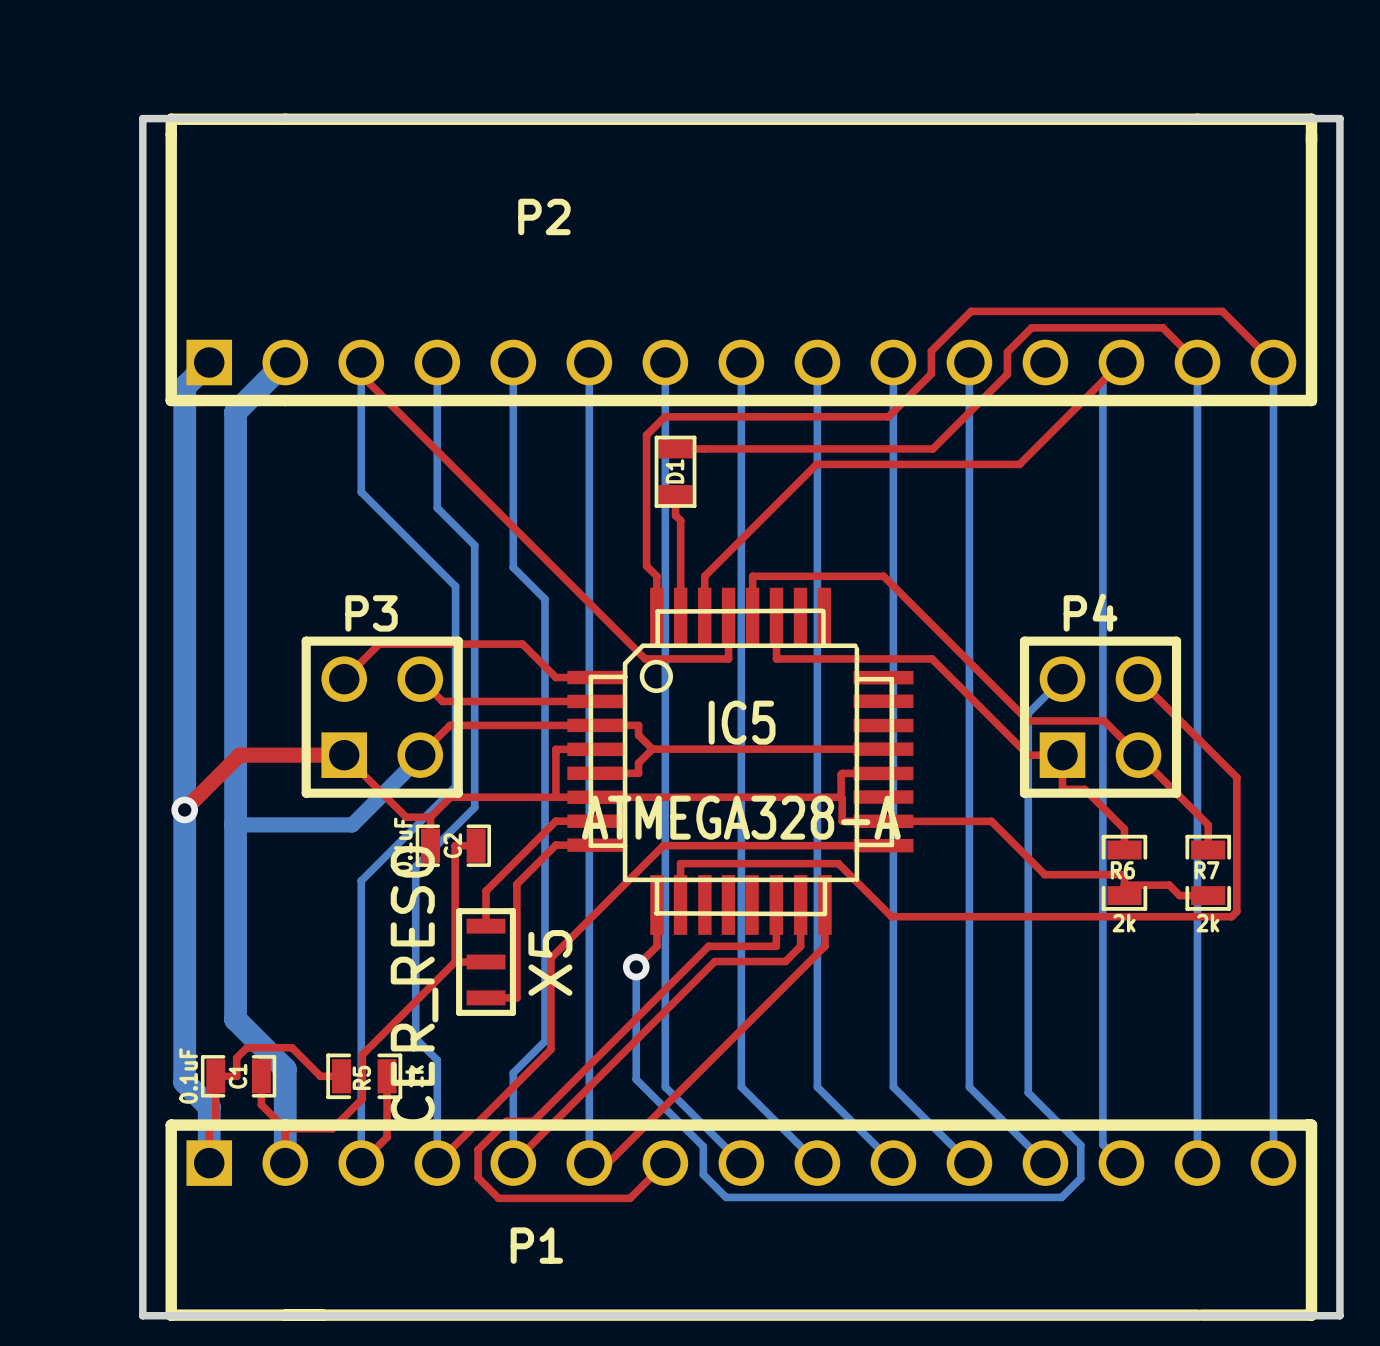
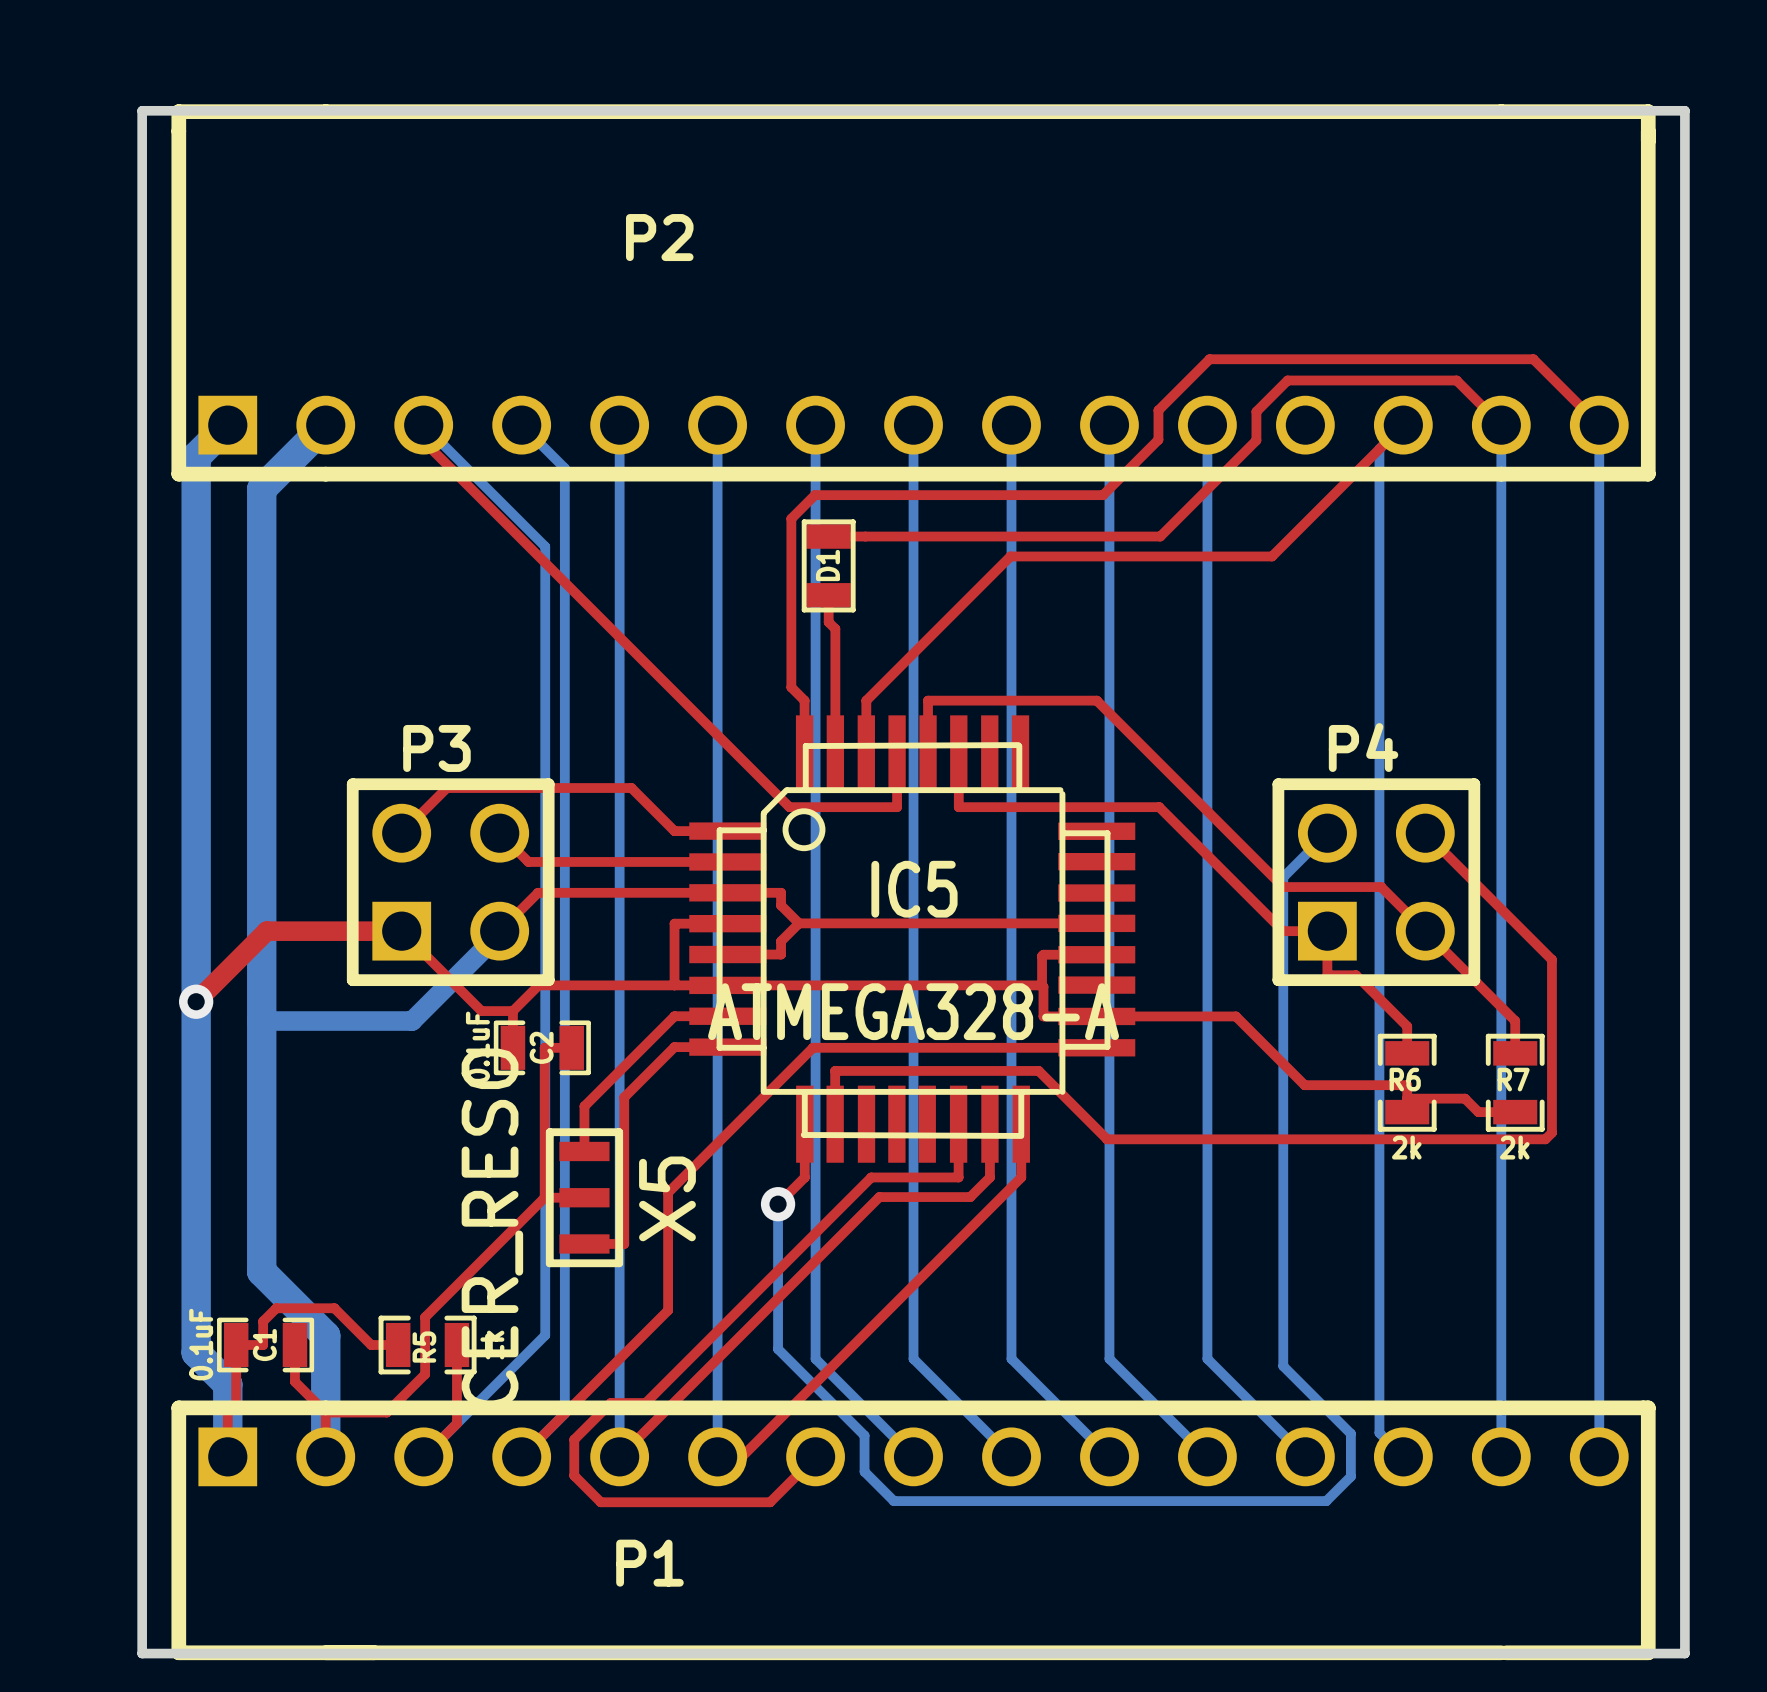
bottom track: (361, 362) (361, 492) (455, 586) -> (423, 425) (545, 546) (545, 713)
bottom track: (437, 362) (437, 507) (474, 545) (474, 807) (415, 866) (415, 1038) (437, 1060) (437, 1163) -> (521, 425) (564, 468) (564, 1413) (521, 1456)
bottom track: (513, 567) (545, 599) (545, 1041) (513, 1073) -> (619, 689) (619, 1340)
bottom track: (455, 786) (361, 880) (361, 1163) -> (545, 971) (545, 1335) (423, 1456)

